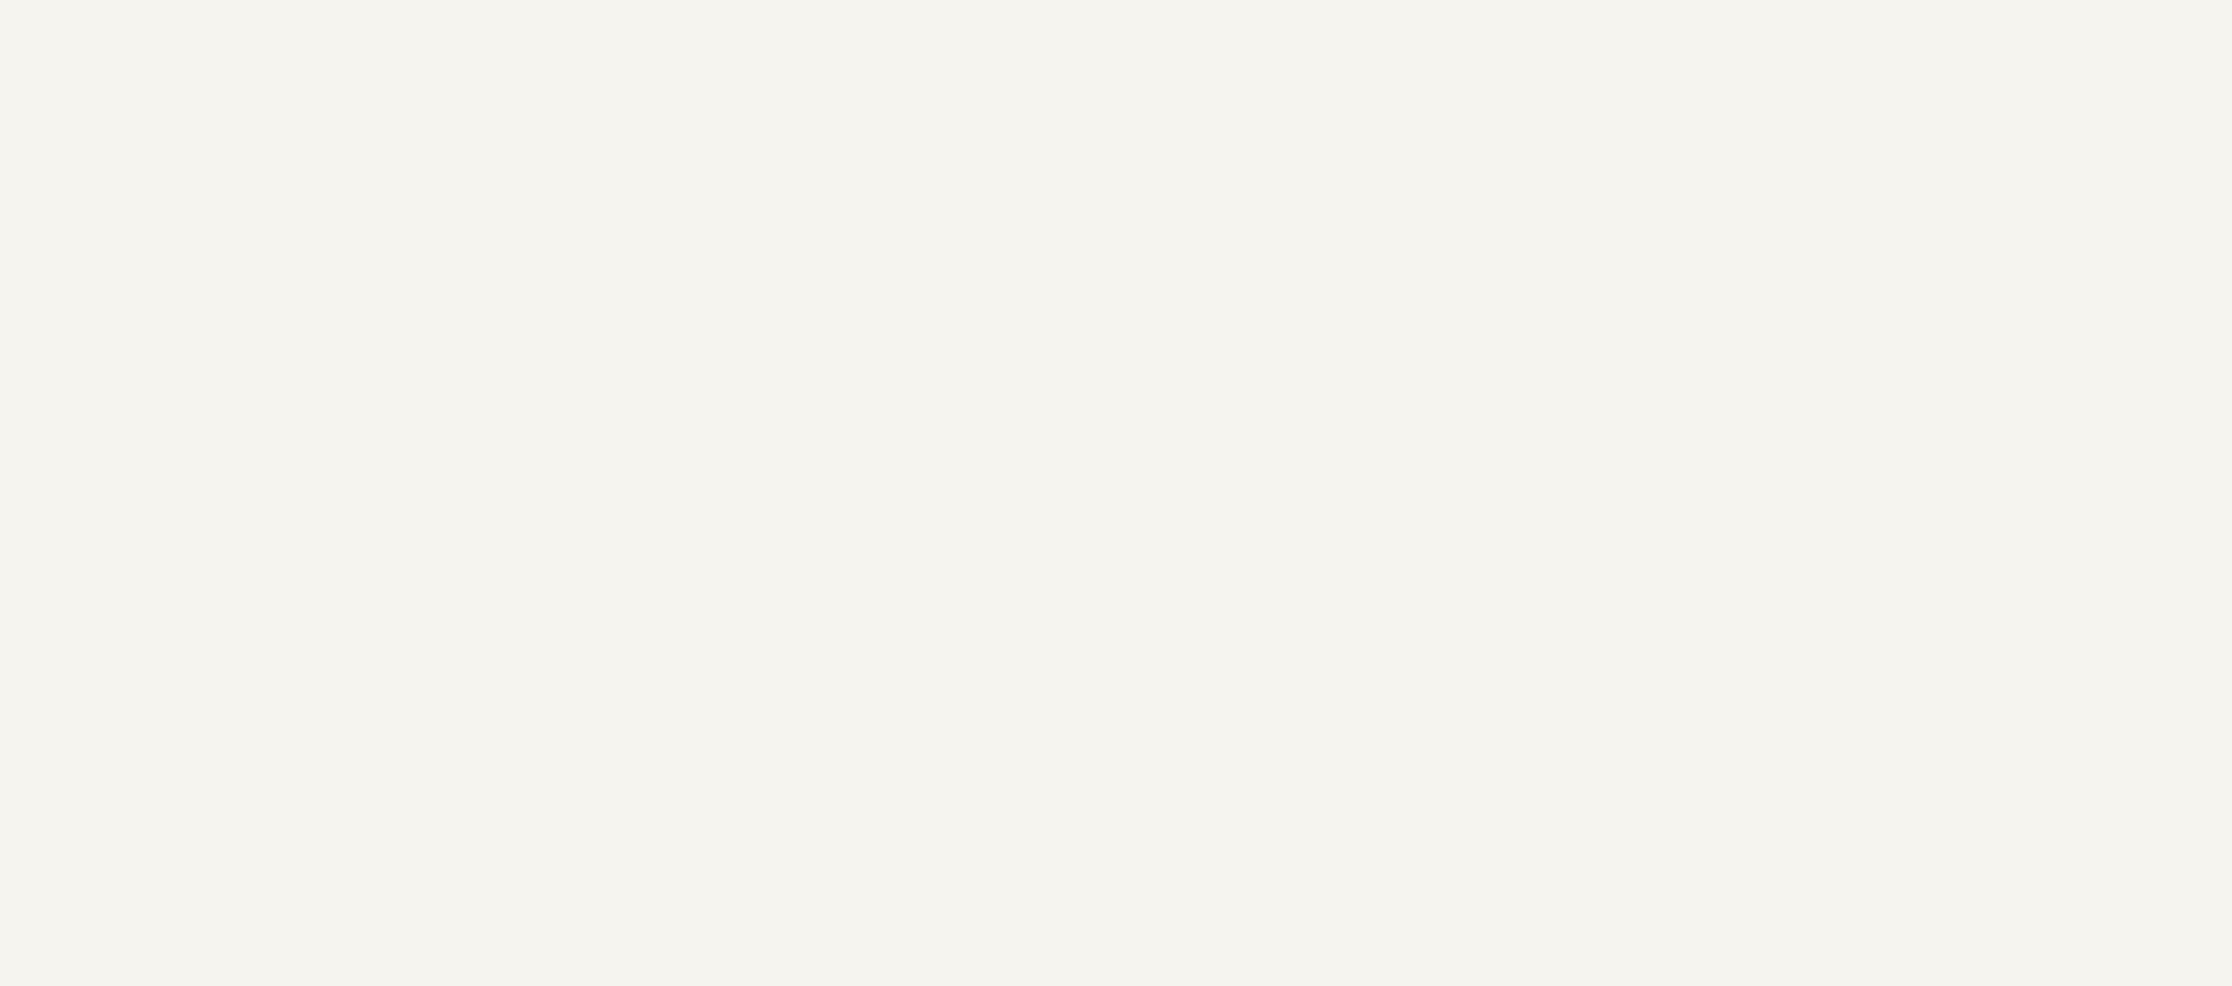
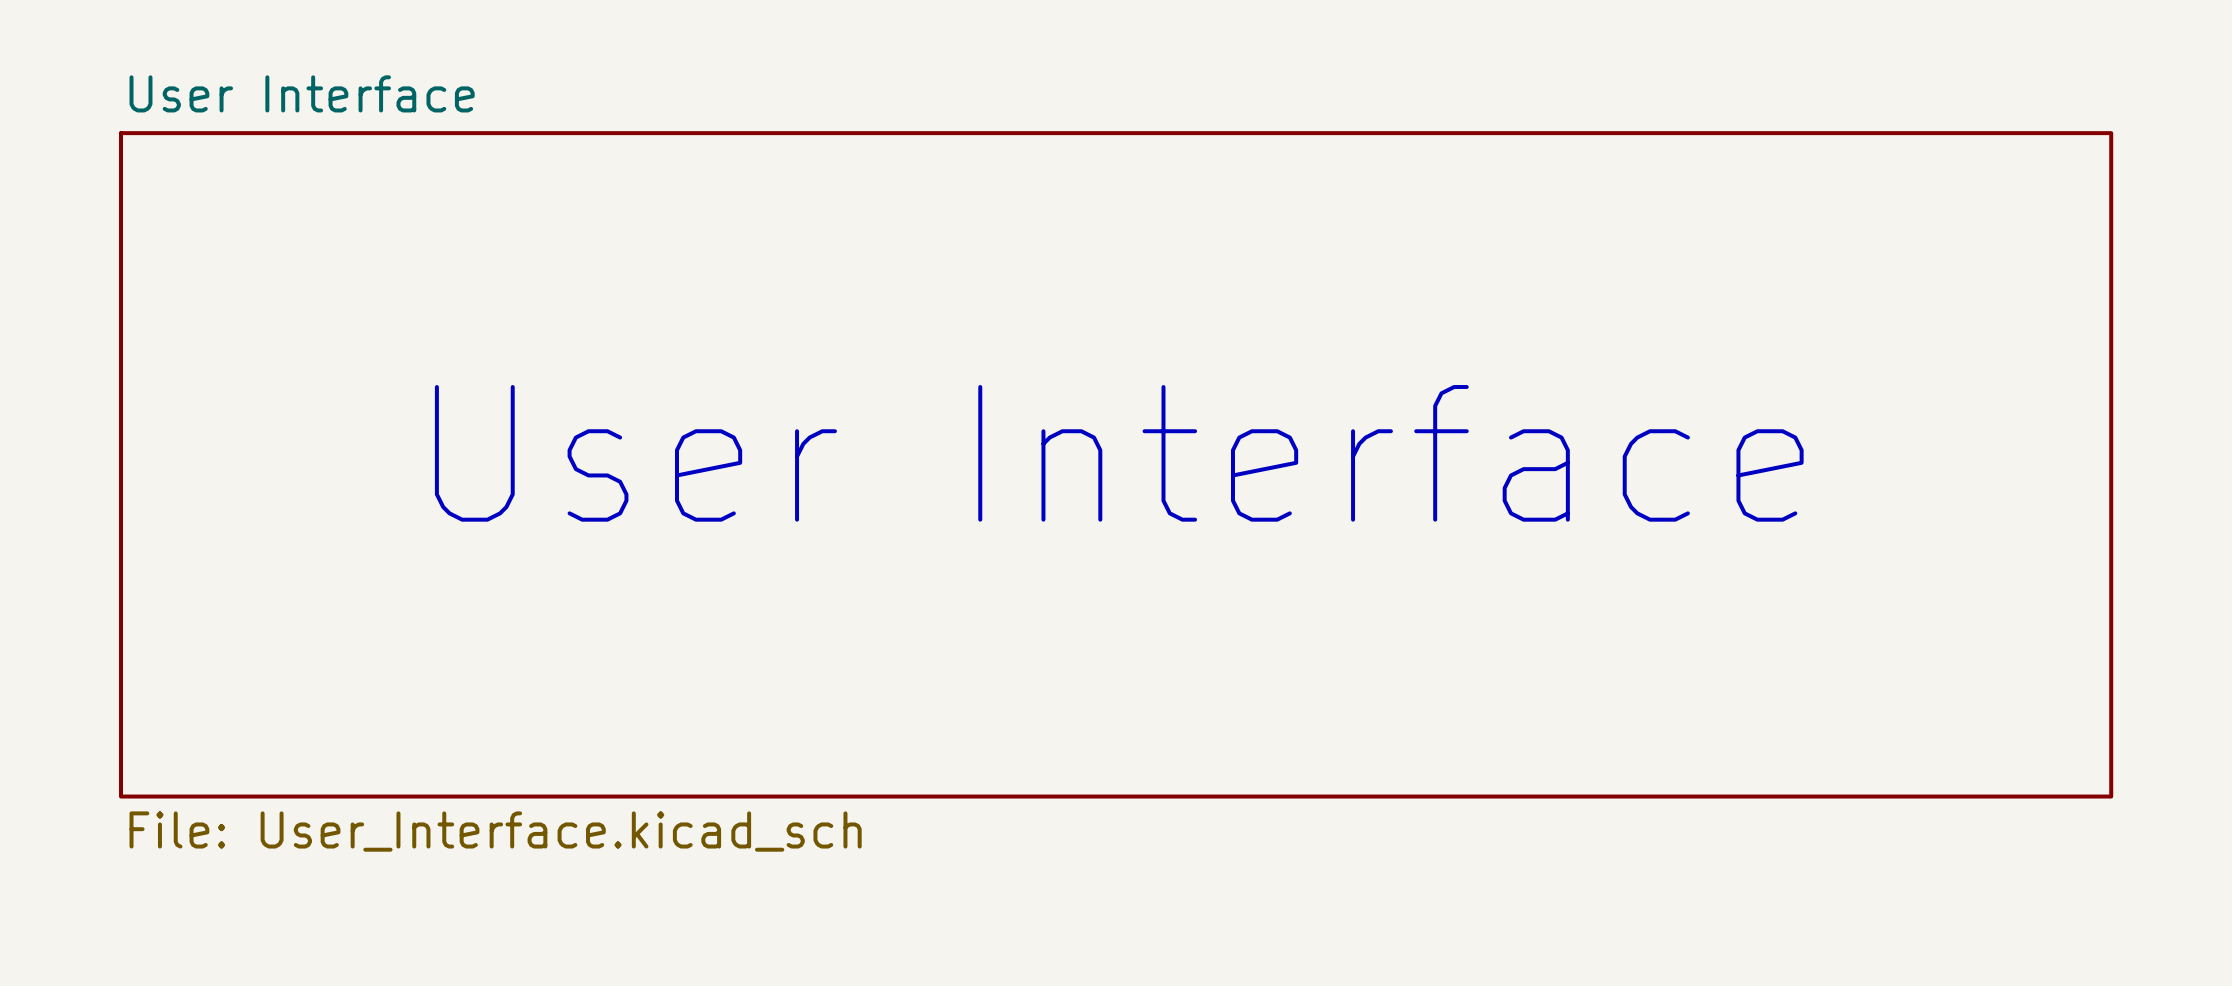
text: none -> User Interface (1119, 453)
sheet User Interface: none -> File: User_Interface.kicad_sch (1116, 464)

